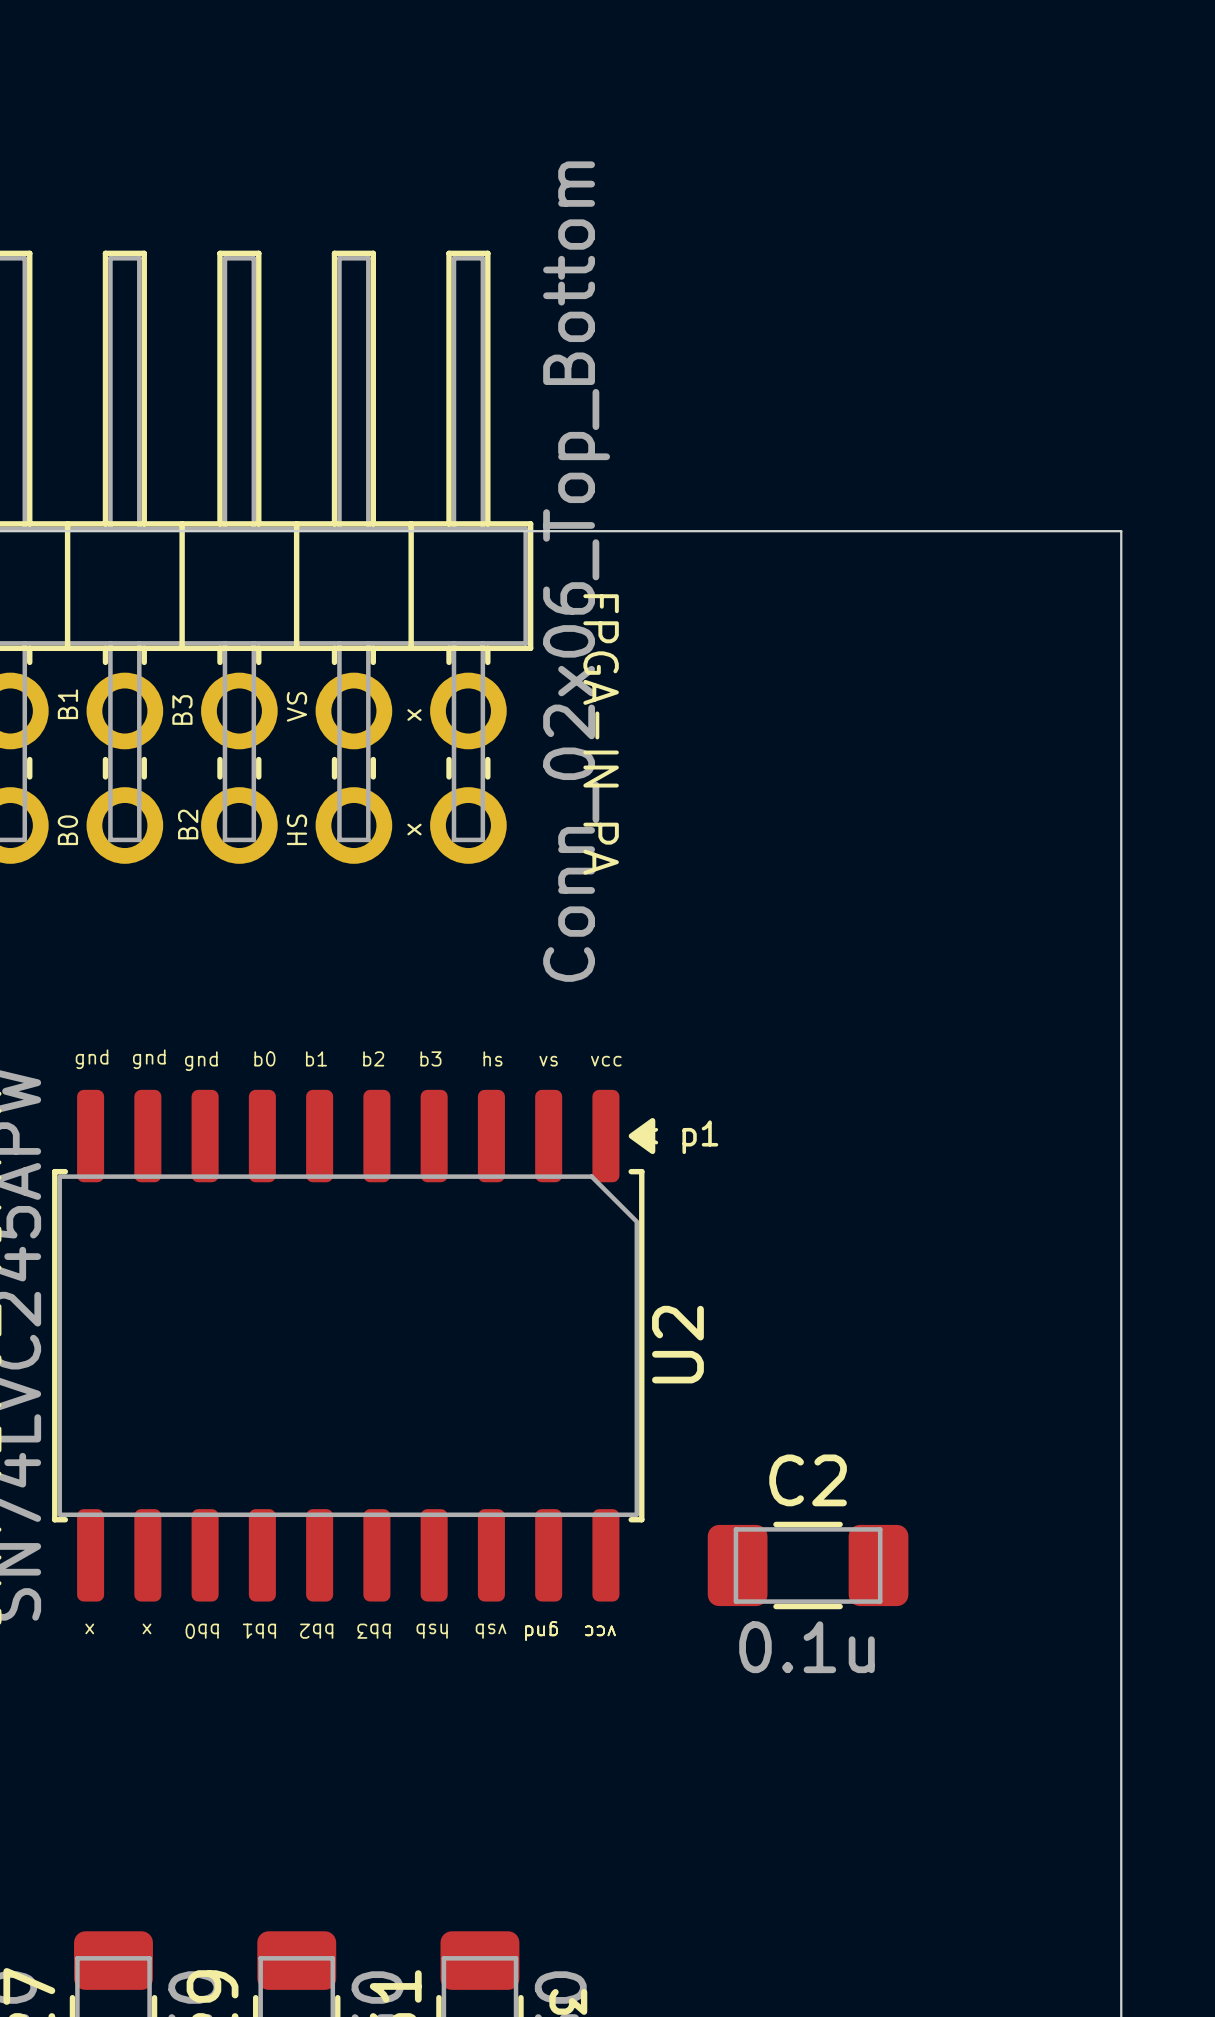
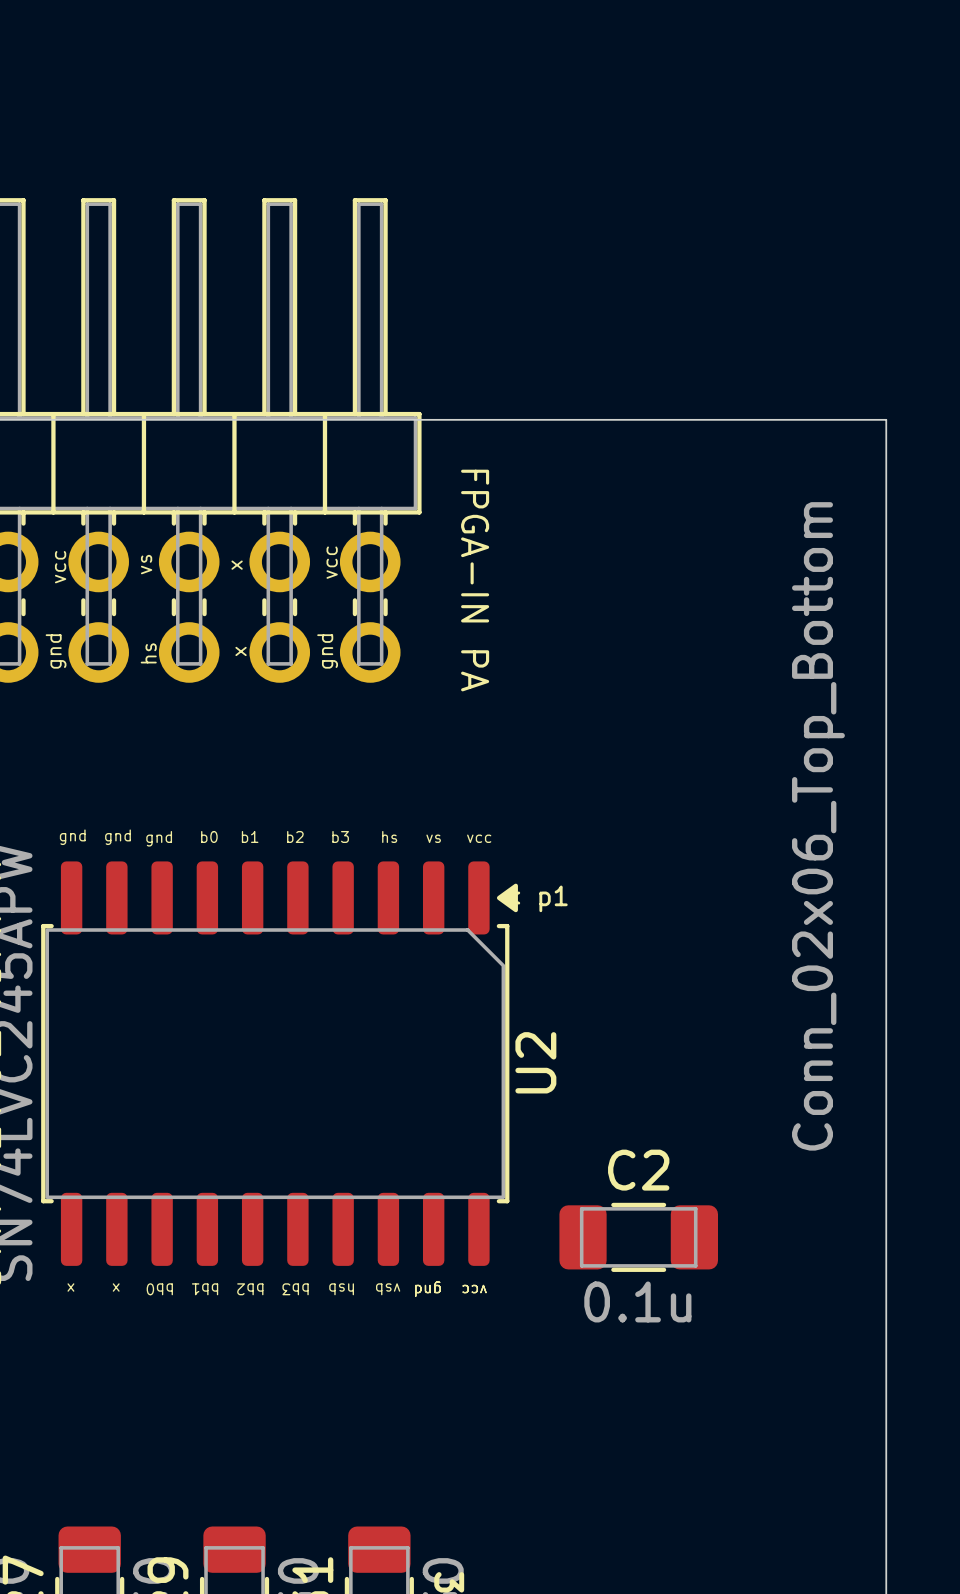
part value position: Conn_02x06_Top_Bottom (576, 571) -> Conn_02x06_Top_Bottom (818, 826)
text: B1 (67, 704) -> vcc (60, 567)
text: VS (296, 706) -> x (237, 565)
text: B3 (182, 709) -> vs (146, 564)
text: x (414, 715) -> vcc (332, 562)
text: B2 (188, 824) -> hs (148, 653)
text: HS (296, 829) -> x (241, 651)
text: x (414, 829) -> gnd (327, 651)
text: B0 (67, 830) -> gnd (56, 651)

